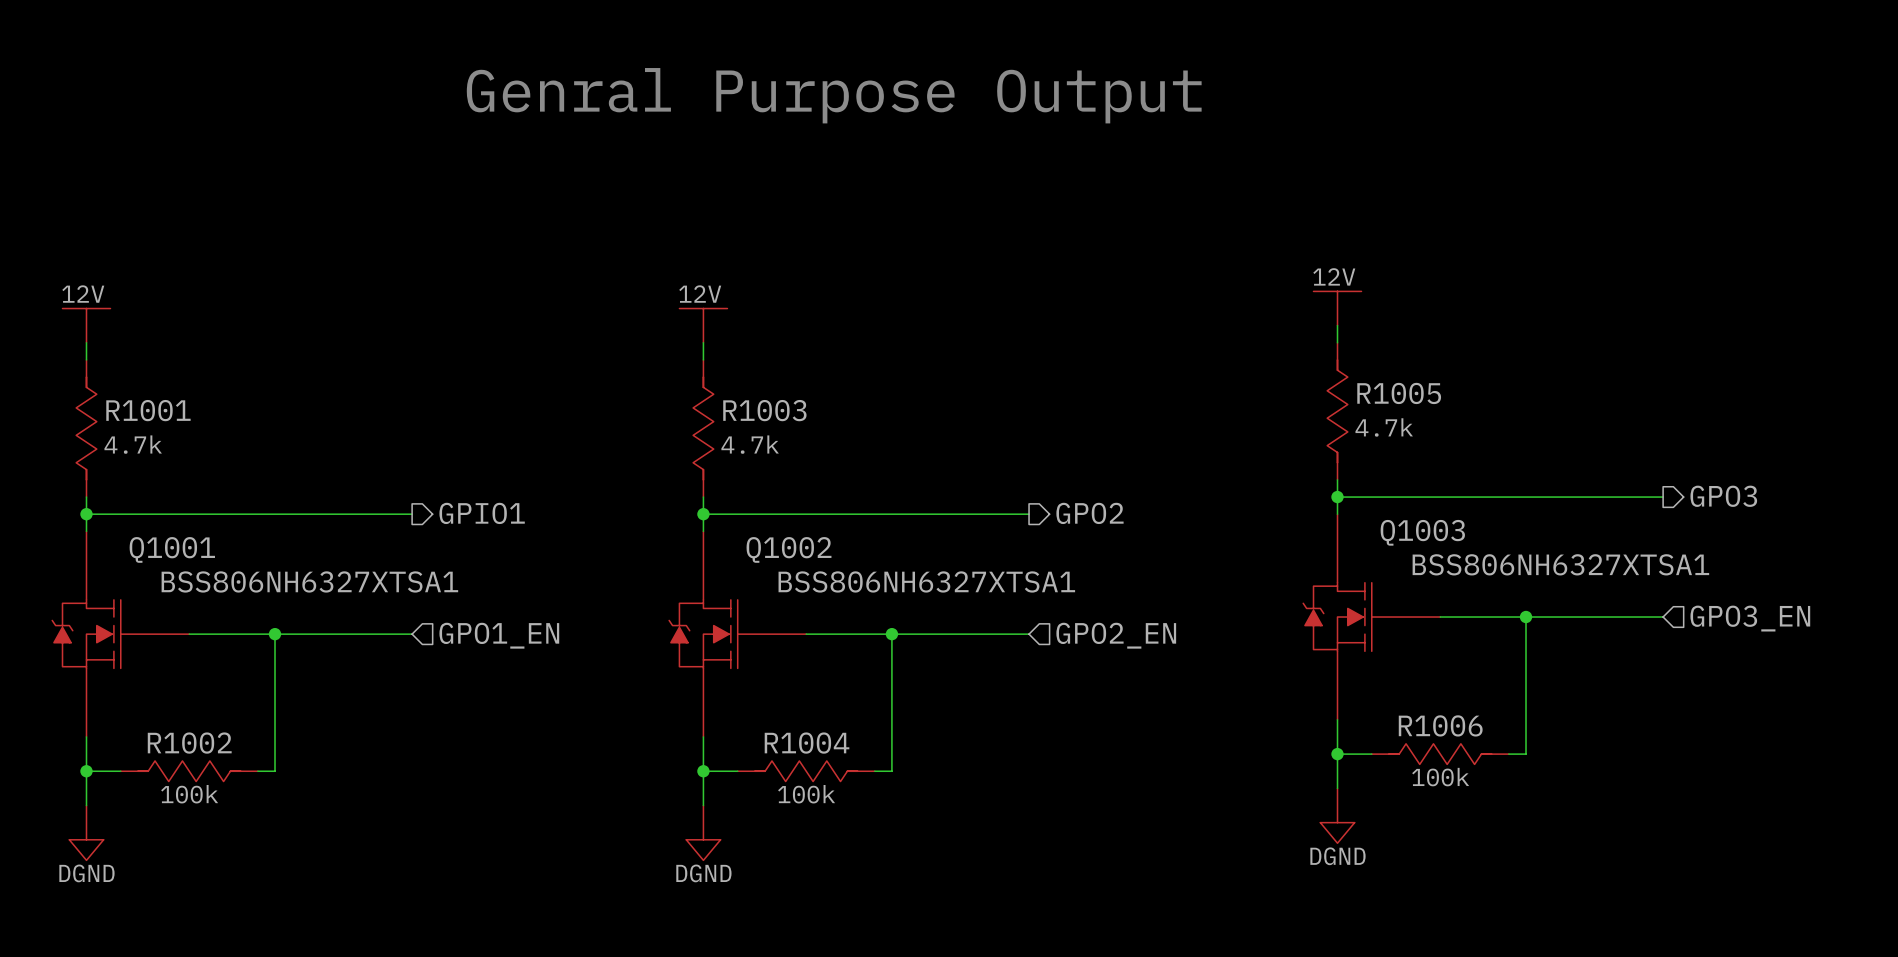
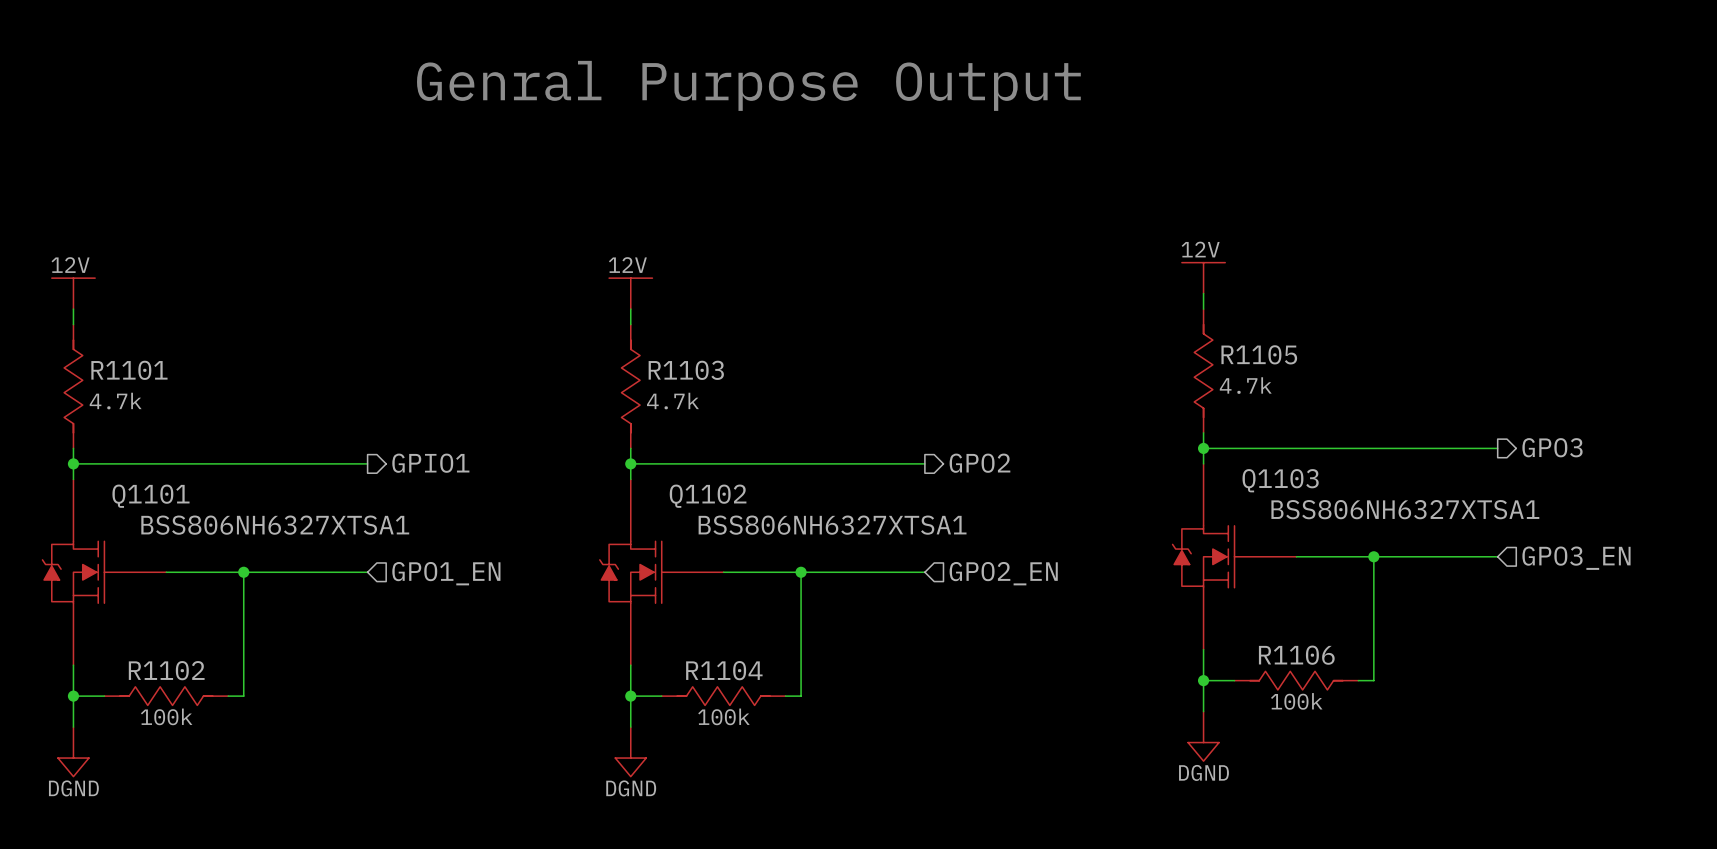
R1005 name: R1005 (1399, 393) -> R1105 (1259, 354)
R1001 name: R1001 (148, 410) -> R1101 (129, 370)
R1003 name: R1003 (764, 410) -> R1103 (686, 370)
Q1003 name: Q1003 (1422, 532) -> Q1103 (1280, 480)
Q1001 name: Q1001 (172, 549) -> Q1101 (150, 496)
Q1002 name: Q1002 (789, 549) -> Q1102 (708, 496)
R1006 name: R1006 (1440, 725) -> R1106 (1296, 655)
R1002 name: R1002 (189, 743) -> R1102 (166, 670)
R1004 name: R1004 (807, 743) -> R1104 (724, 670)

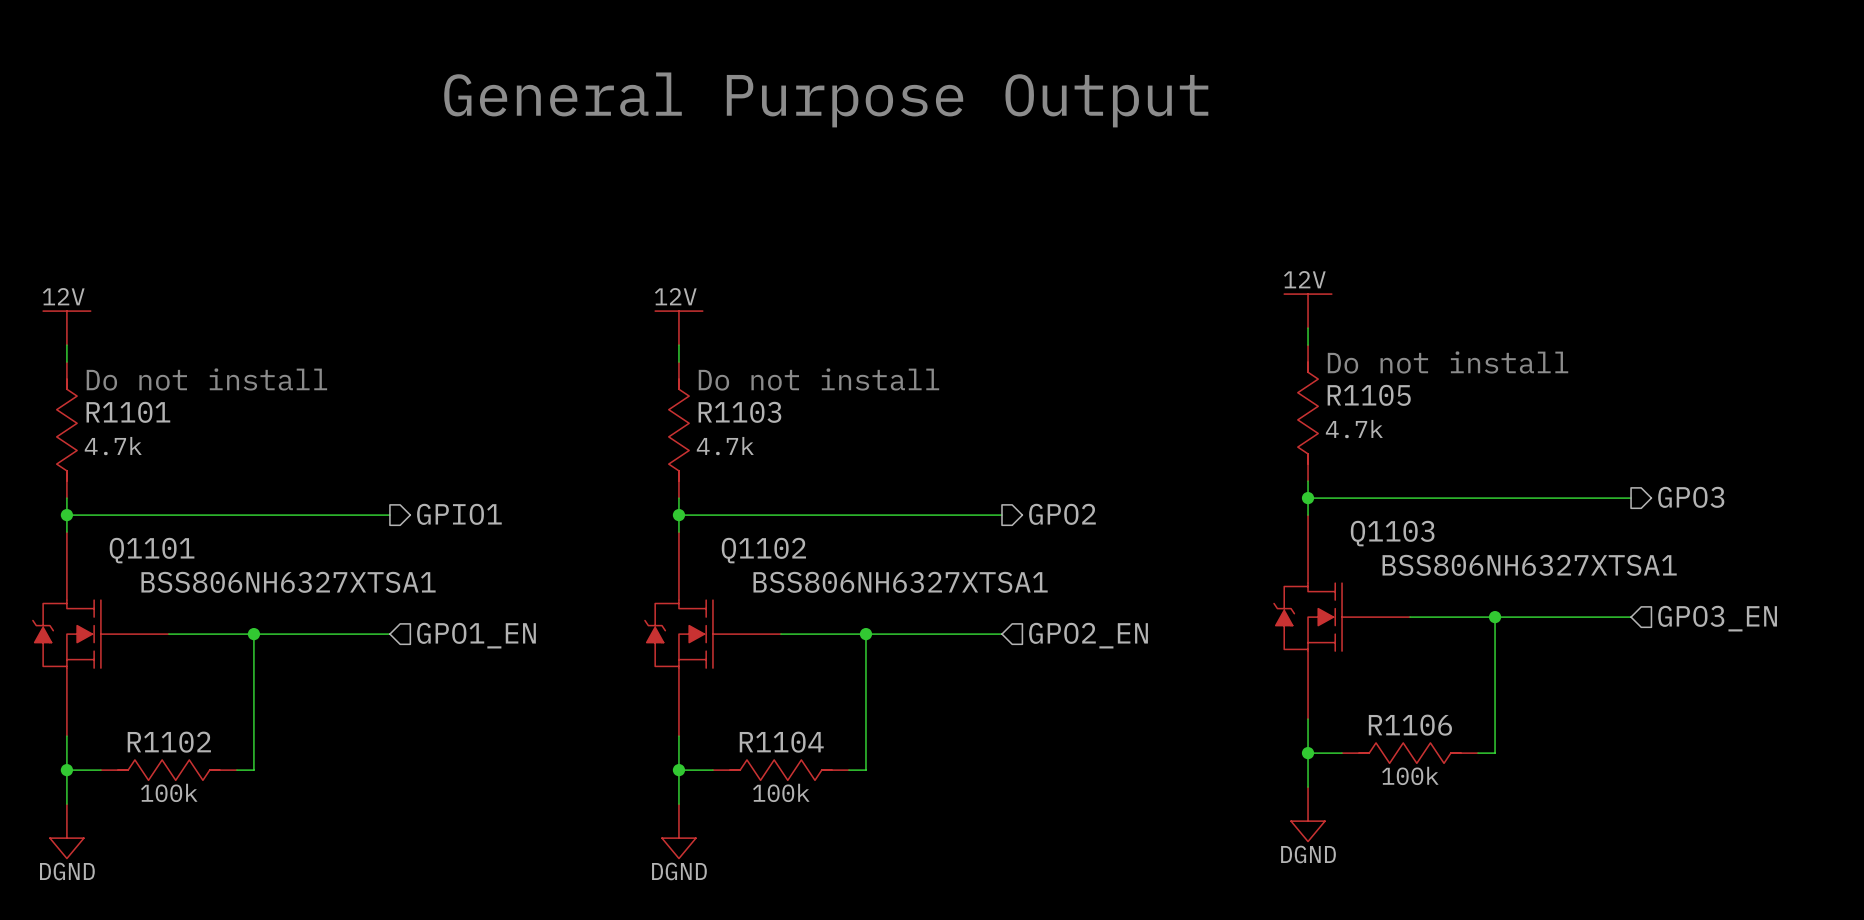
text: Genral Purpose Output (748, 85) -> General Purpose Output (826, 99)
text: none -> Do not install (1448, 362)
text: none -> Do not install (206, 379)
text: none -> Do not install (818, 379)

